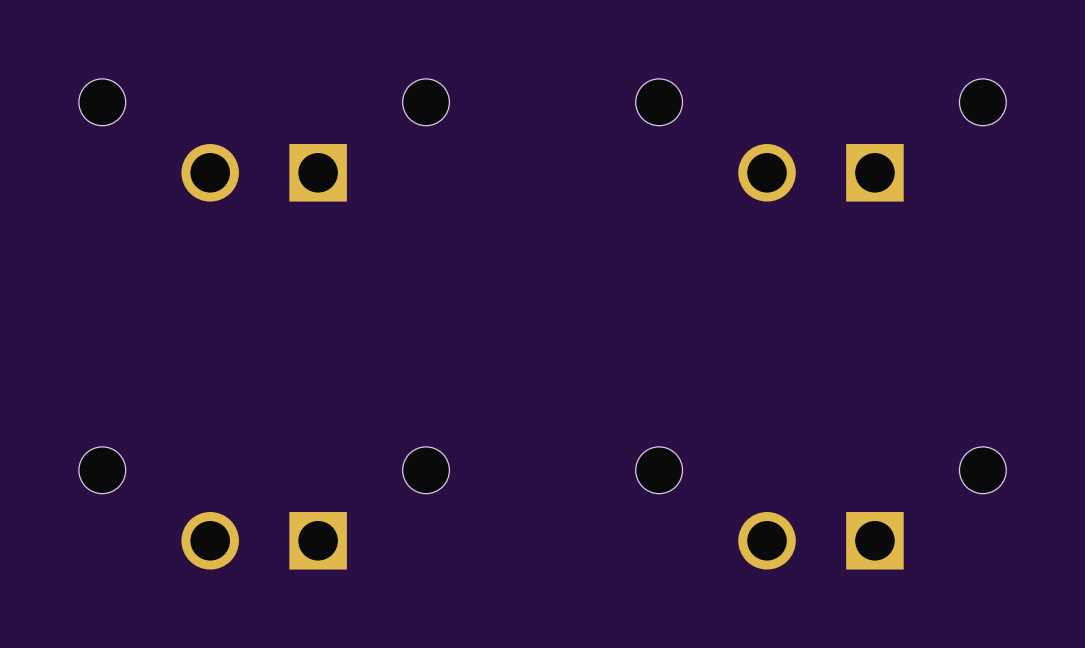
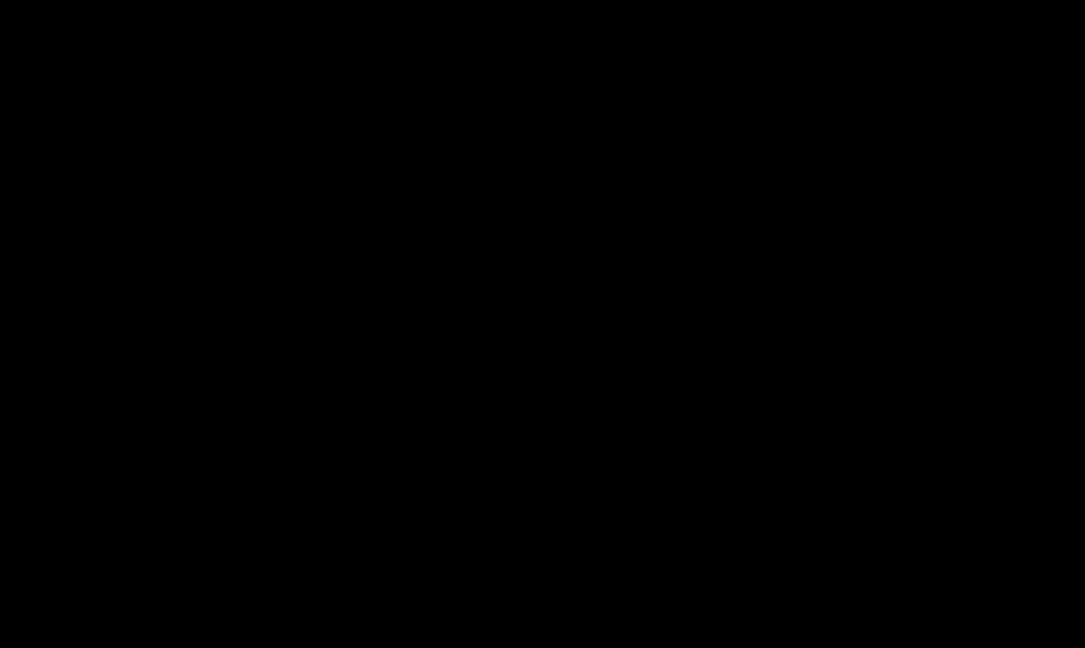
part: (264, 140) -> none
part: (820, 140) -> none
part: (264, 508) -> none
part: (820, 508) -> none

